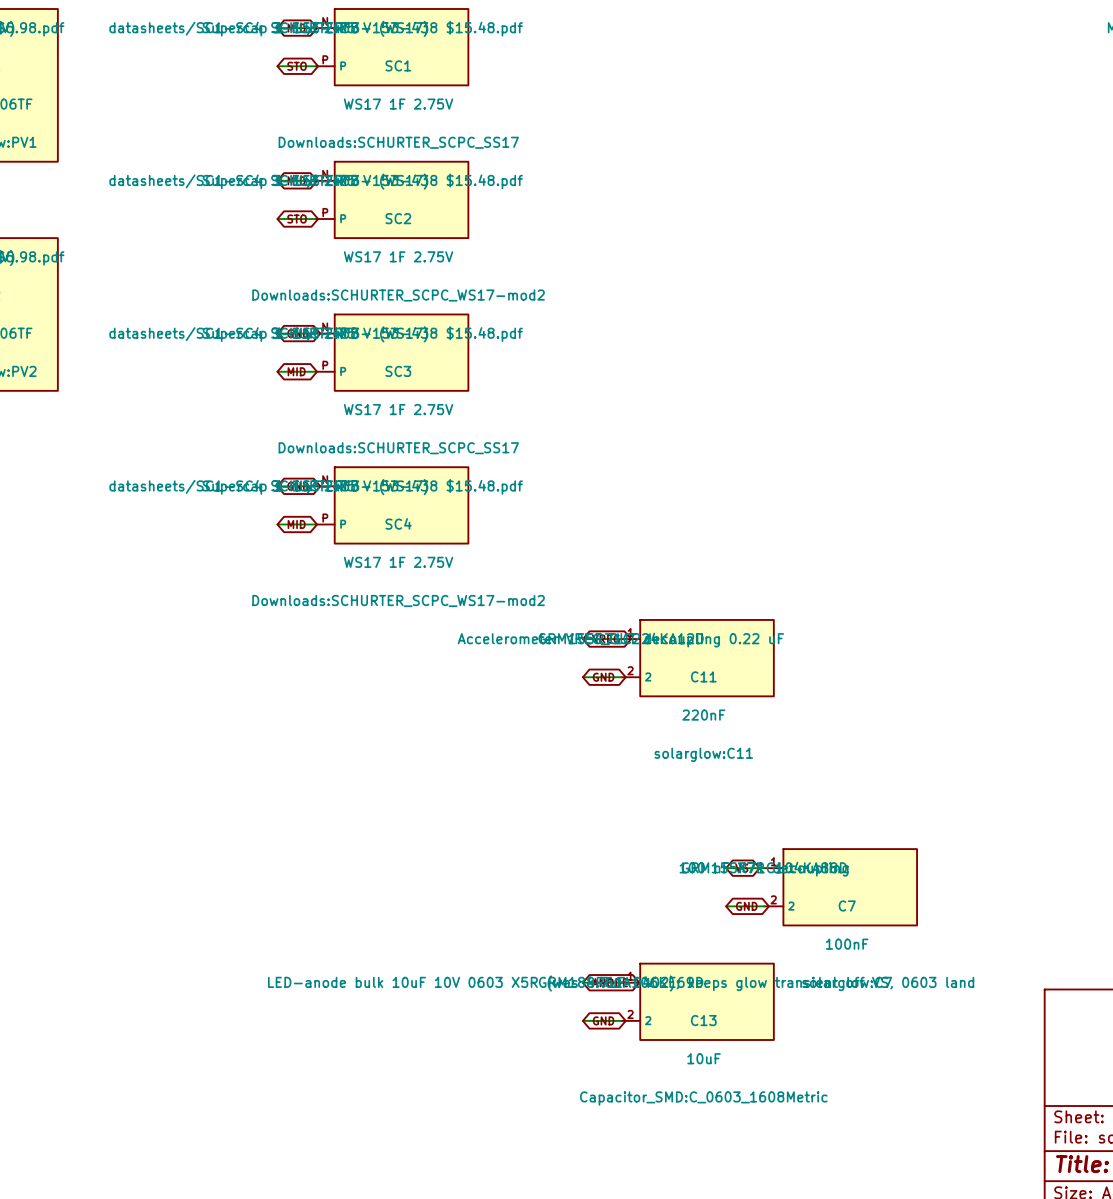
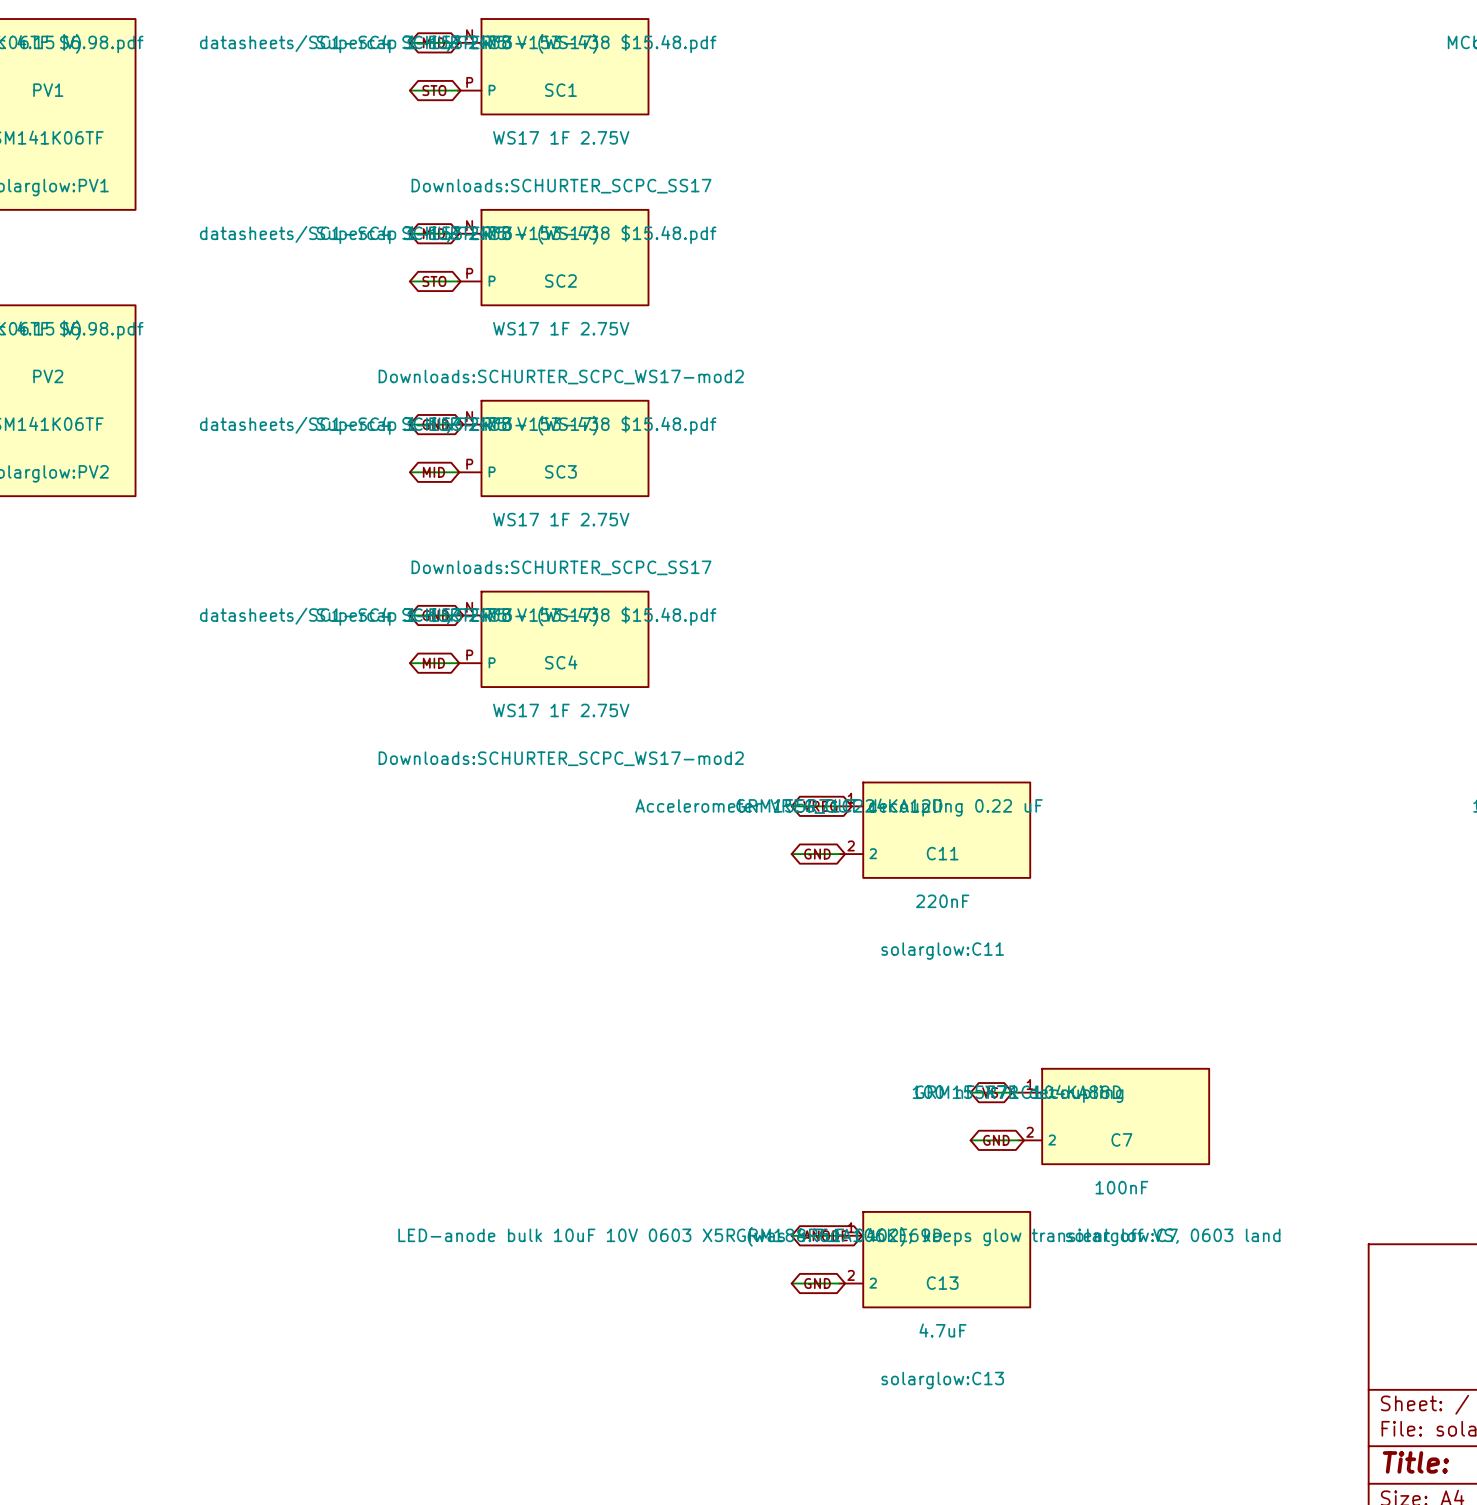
C13 value: 10uF (704, 1058) -> 4.7uF (942, 1330)
C13 text: Capacitor_SMD:C_0603_1608Metric (703, 1098) -> solarglow:C13 (942, 1380)

